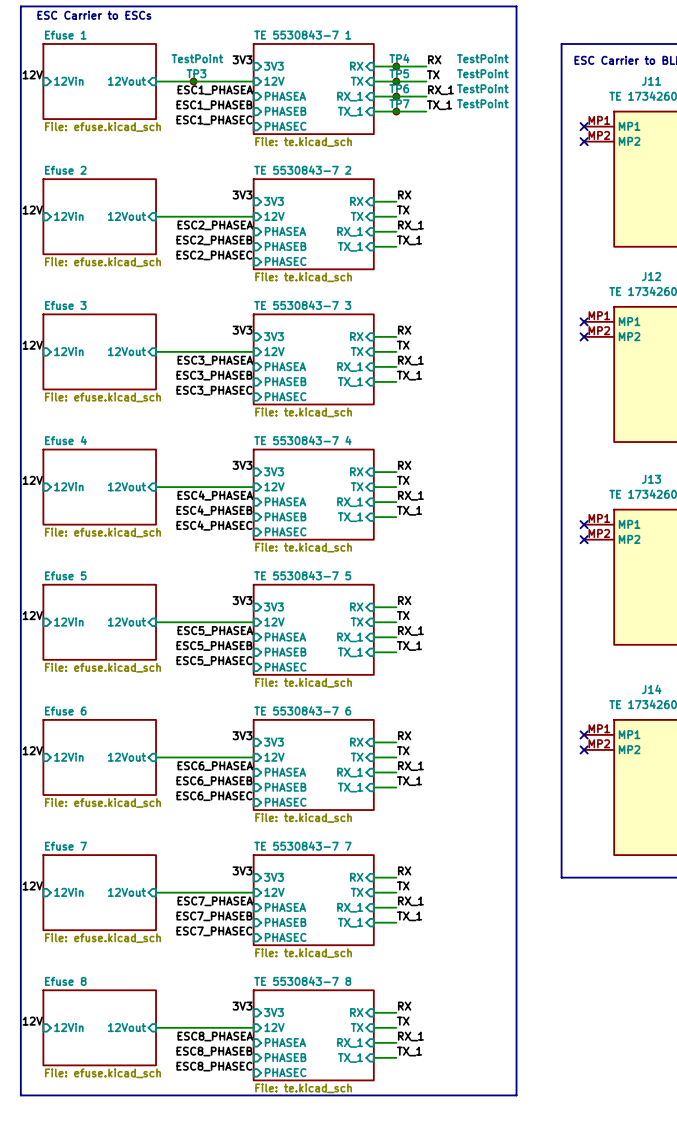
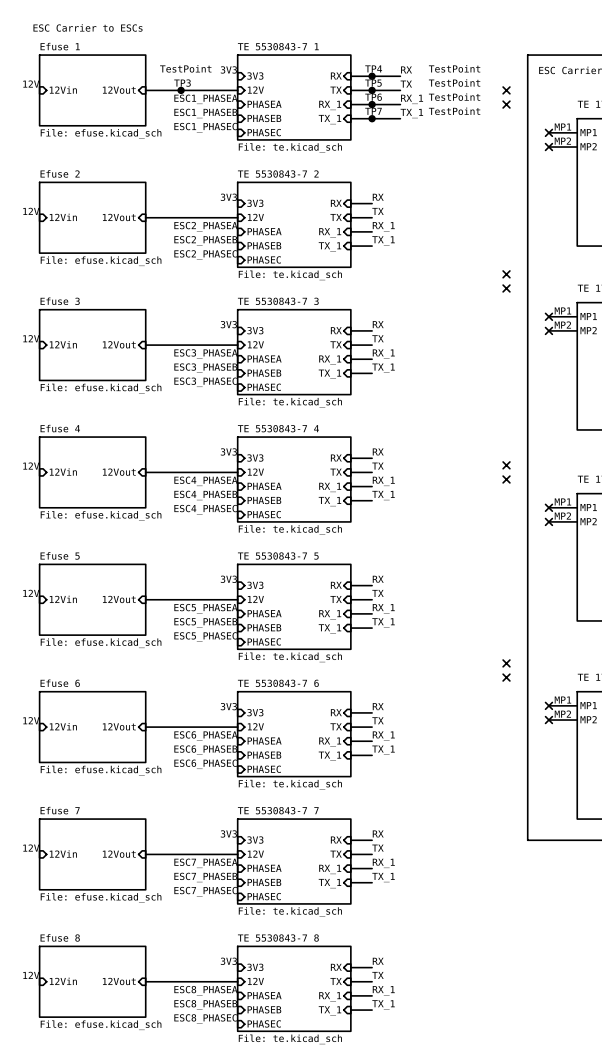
line: (20, 6) (516, 6) (516, 1095) (20, 1095) (20, 6) -> none
no-connect mark: none -> (506, 90)
no-connect mark: none -> (506, 104)
no-connect mark: none -> (506, 274)
no-connect mark: none -> (506, 288)
no-connect mark: none -> (506, 465)
no-connect mark: none -> (506, 479)
no-connect mark: none -> (506, 663)
no-connect mark: none -> (506, 677)

